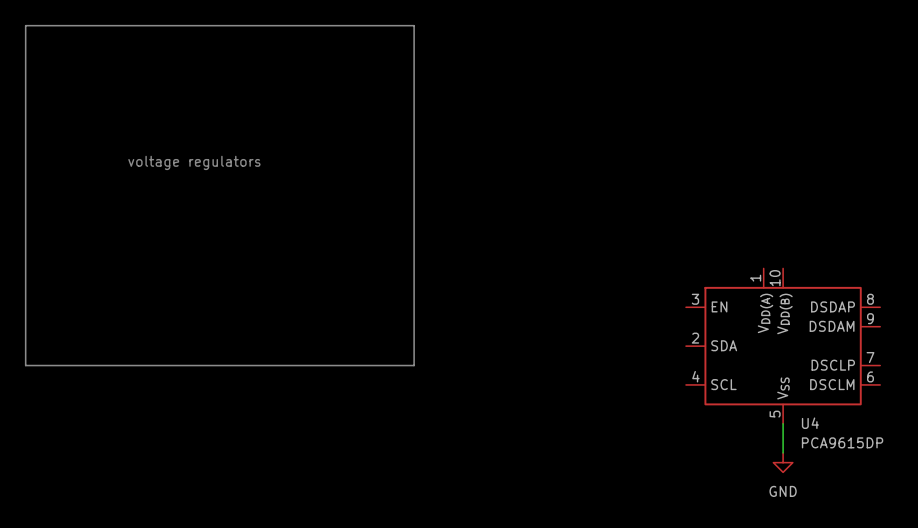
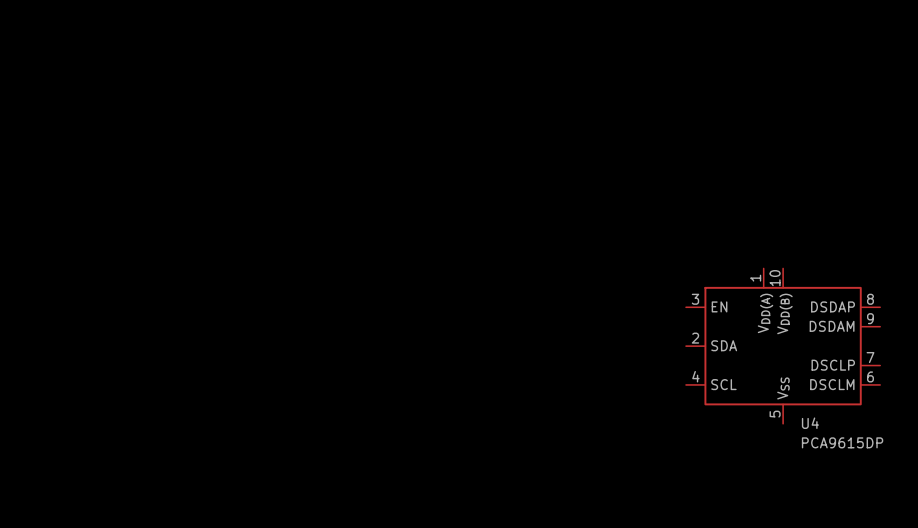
line: (25, 25) (414, 25) (414, 365) (25, 365) (25, 25) -> none
text: voltage regulators (194, 162) -> none
wire: (783, 423) (783, 452) -> none
power symbol: GND (783, 462) -> none

